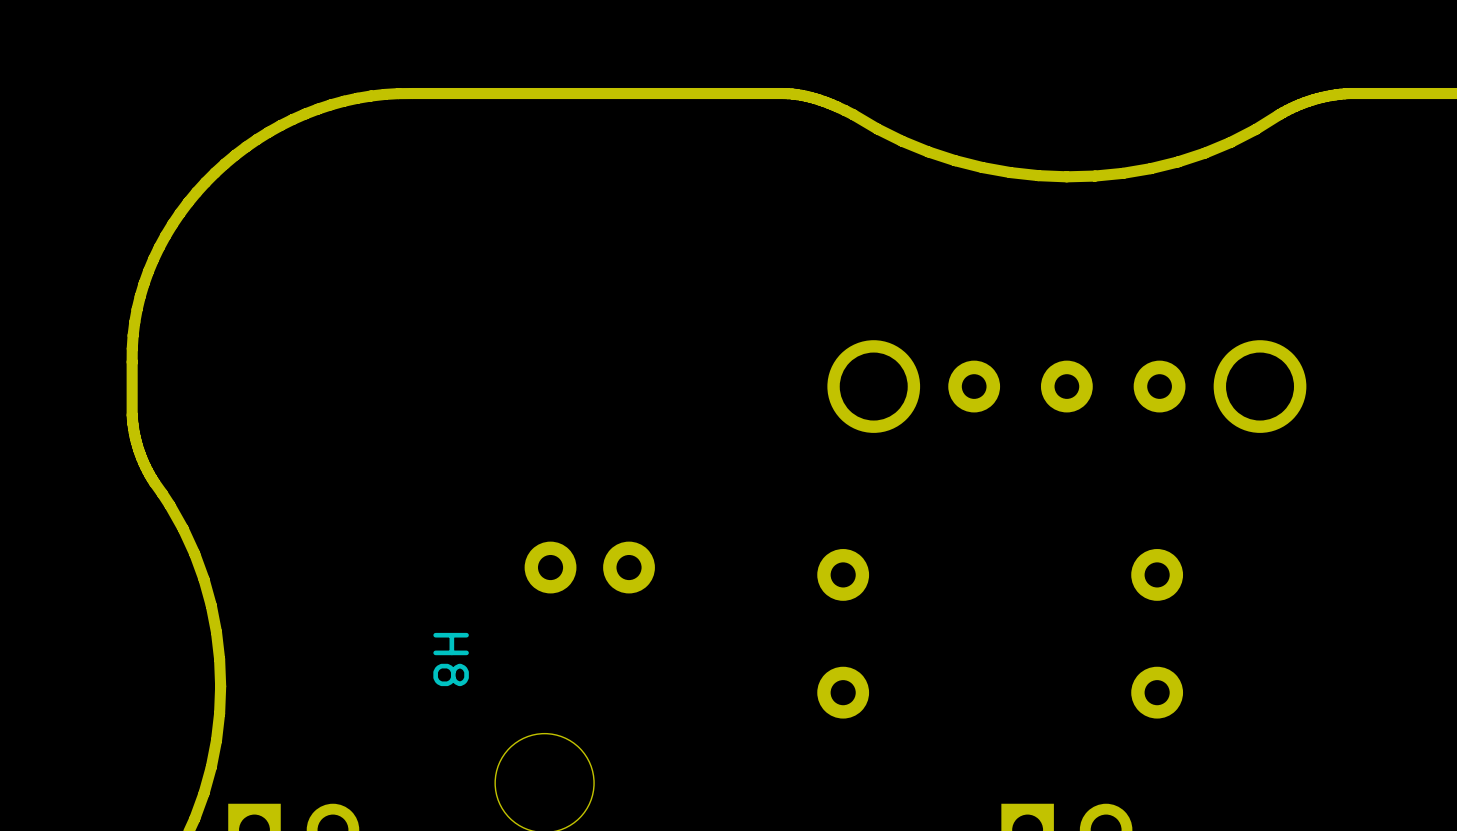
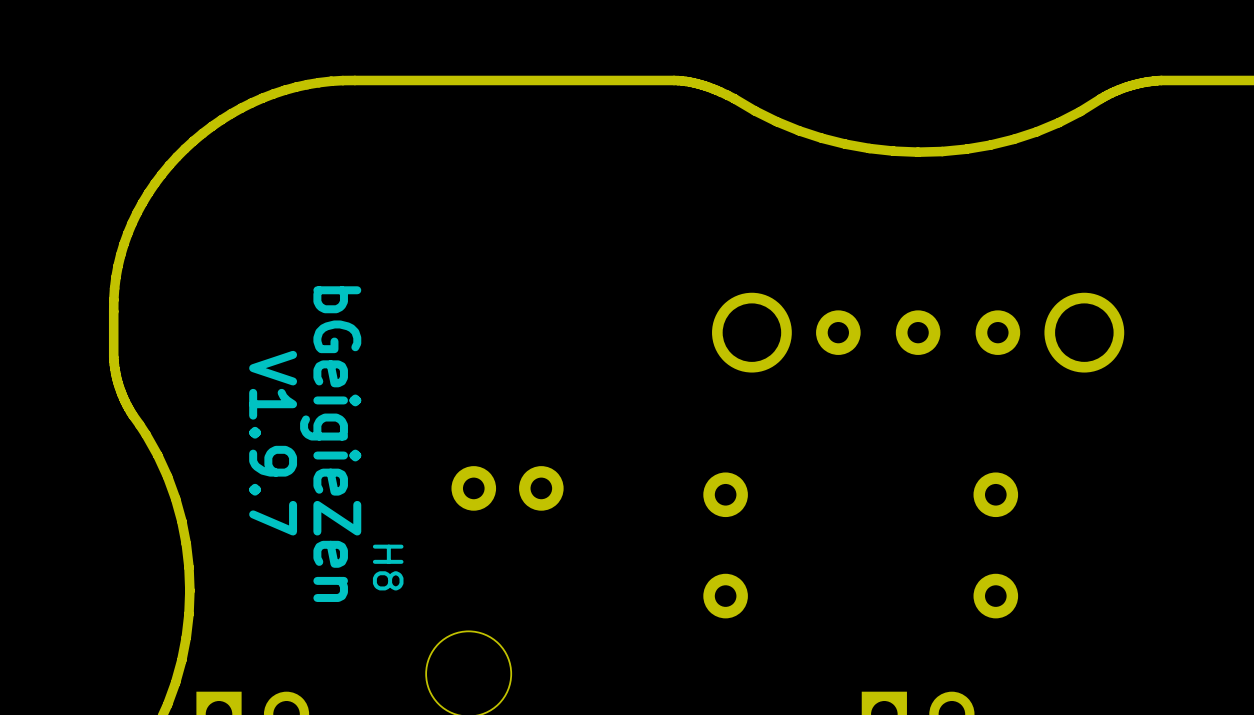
text: none -> V1.9.7 (273, 443)
text: none -> bGeigieZen (330, 444)

